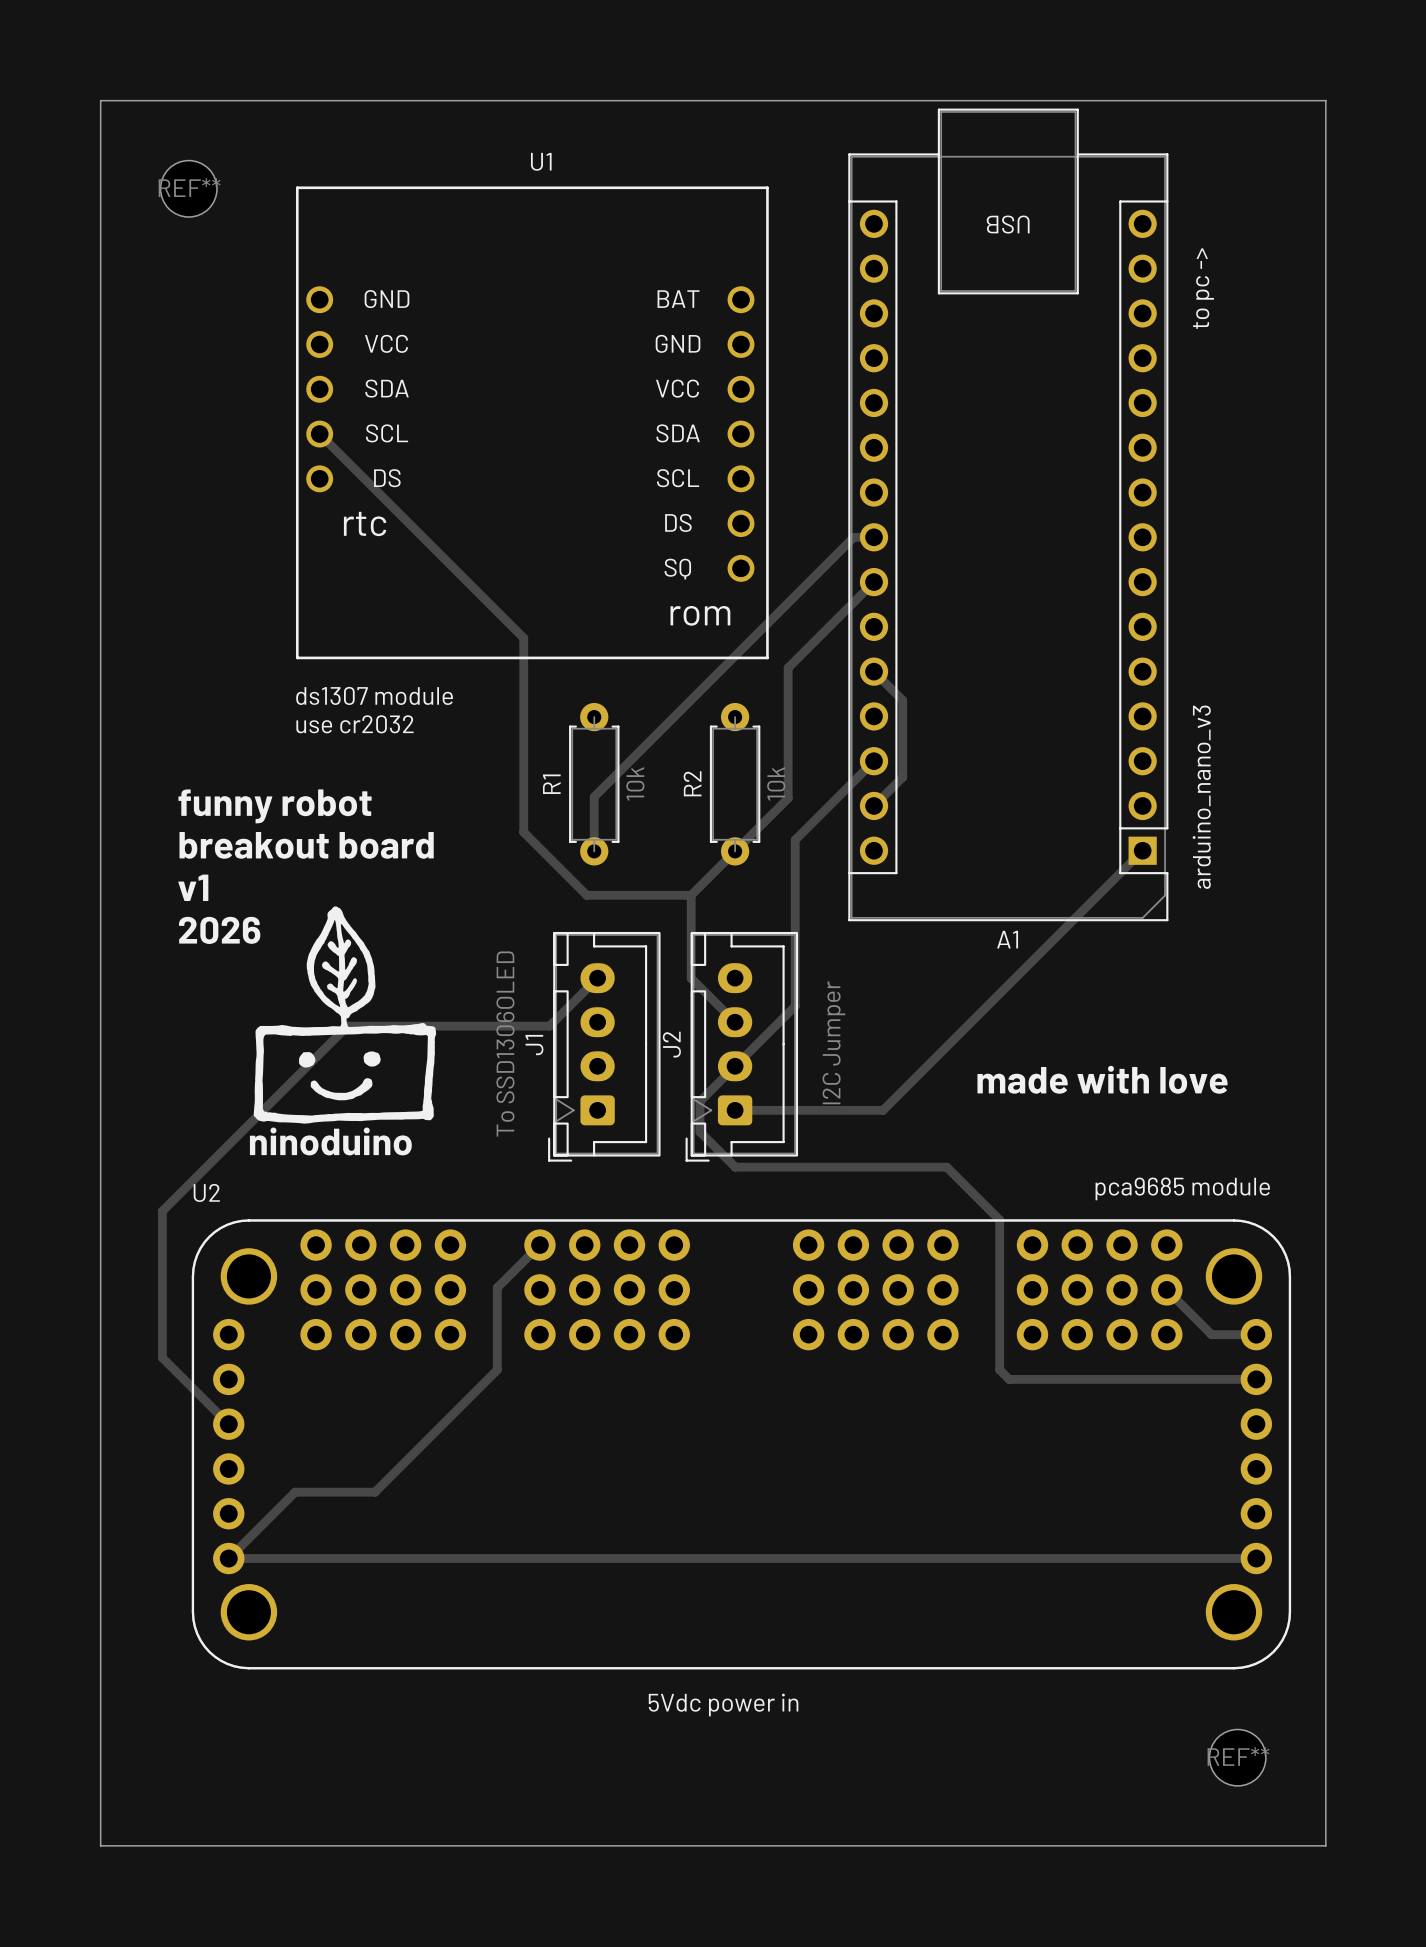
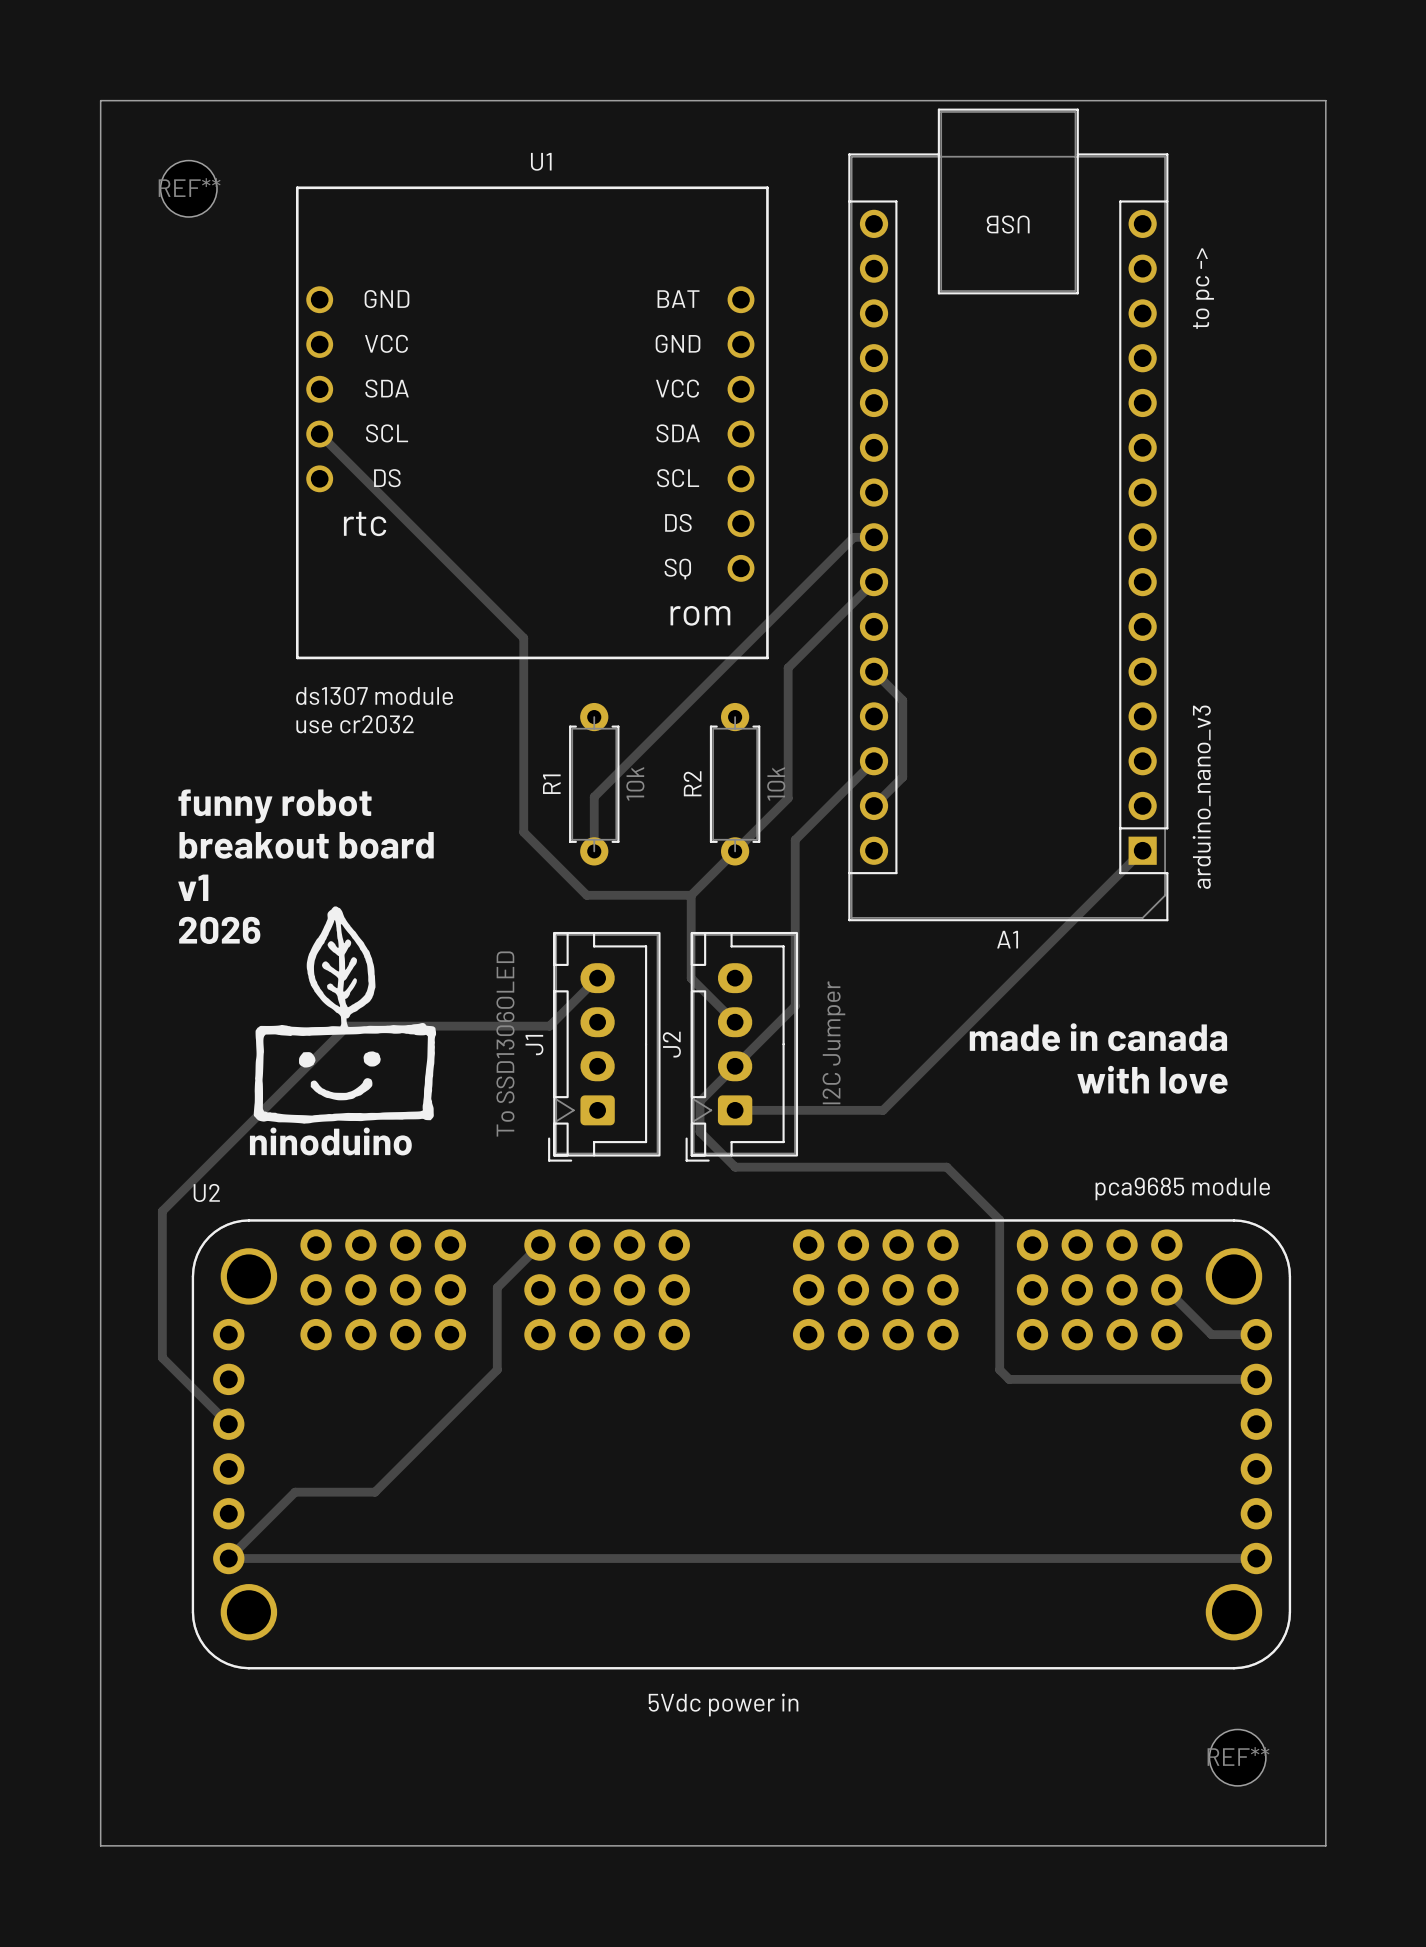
text: none -> made in canada (1098, 1037)
text: made with love (1102, 1079) -> with love (1152, 1079)

